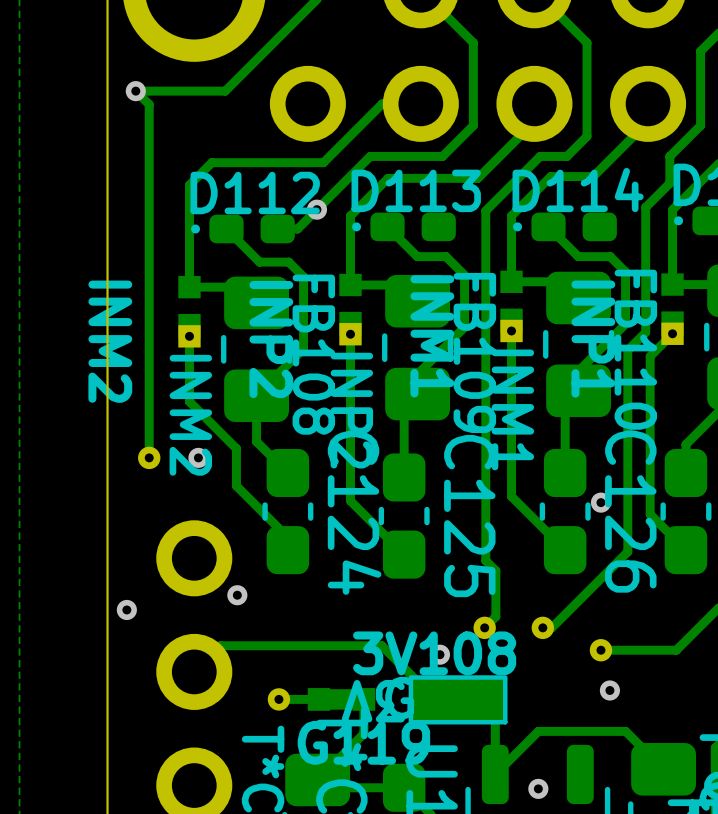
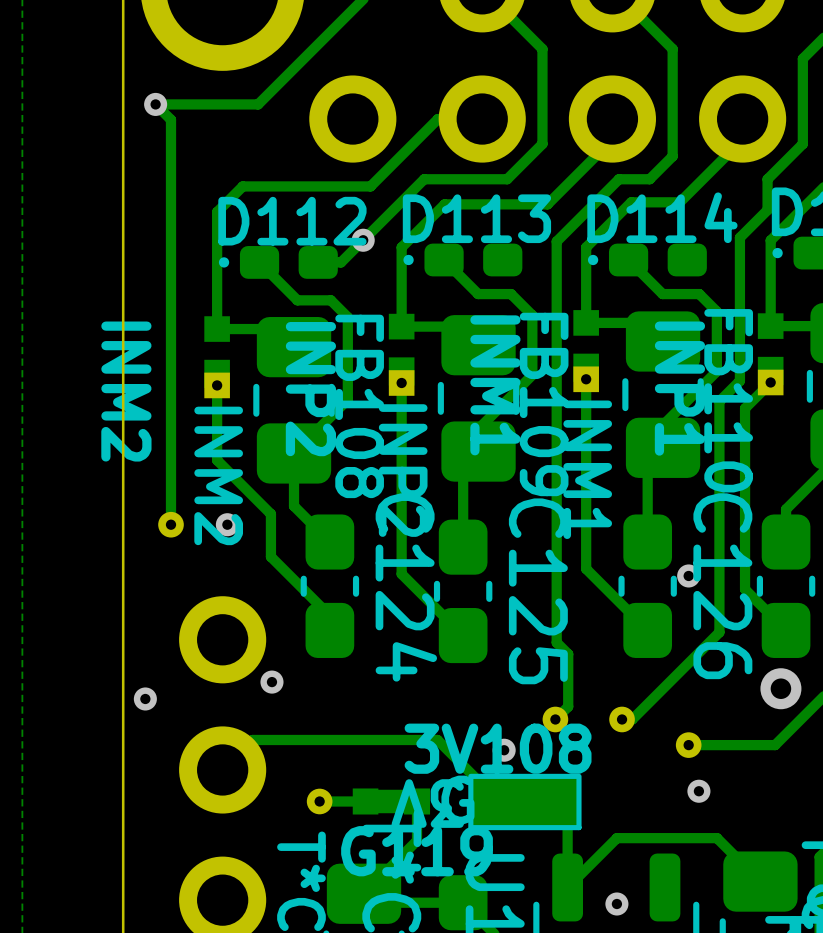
via: none -> (780, 688)

